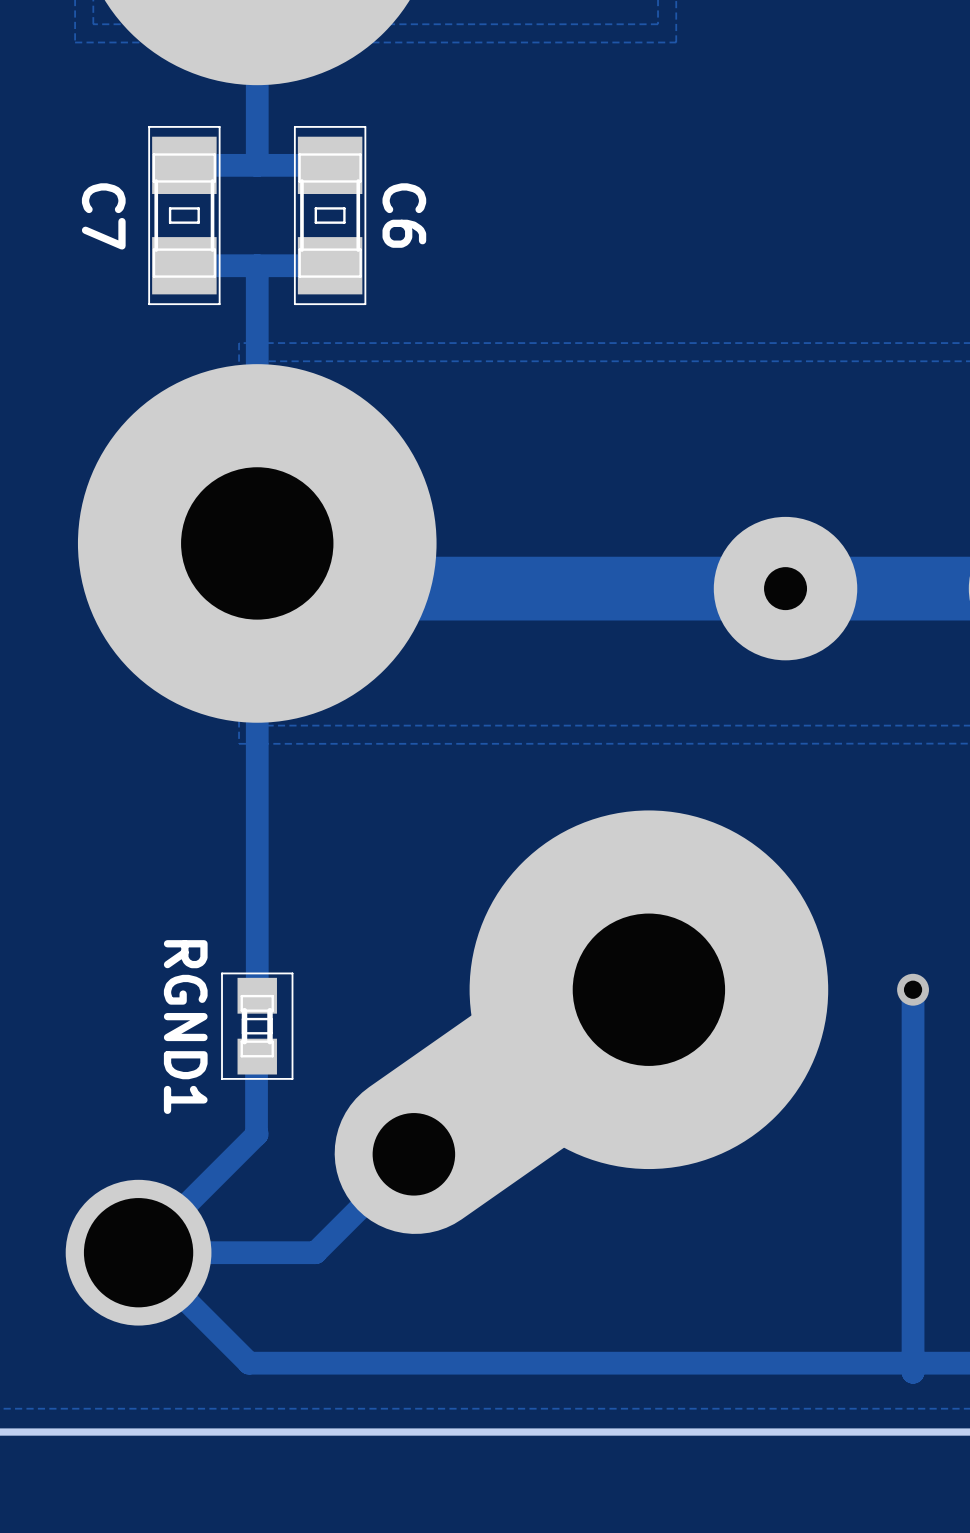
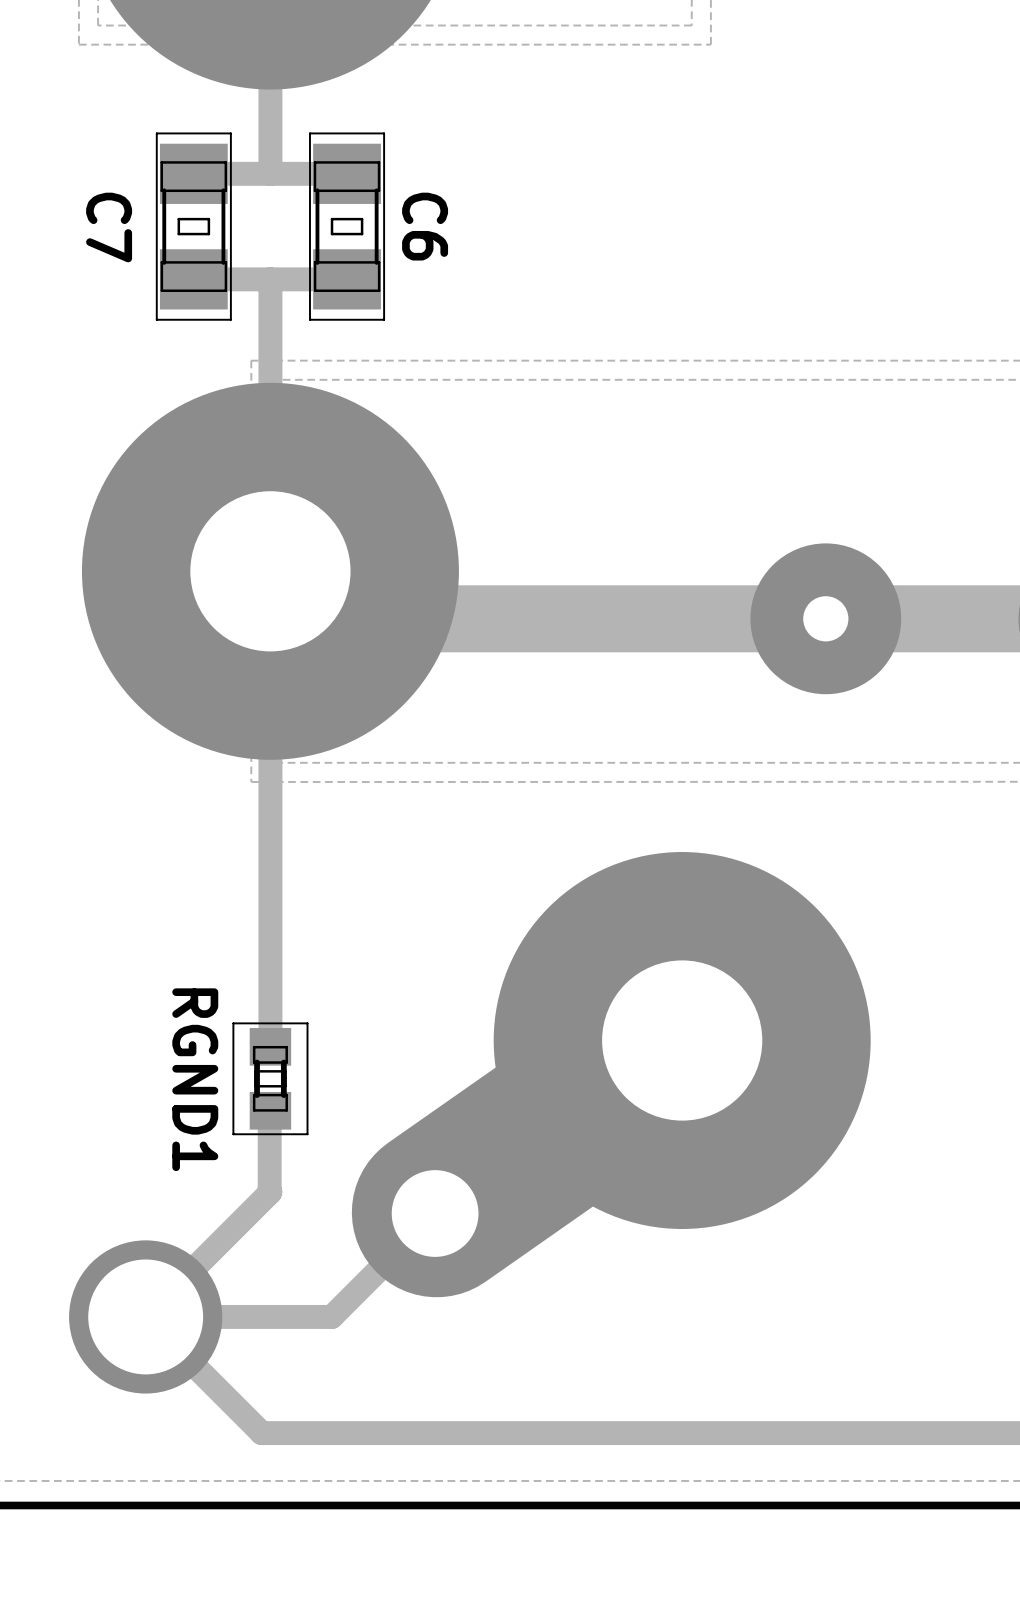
track: (913, 989) (913, 1372) -> none
via: (913, 989) -> none

